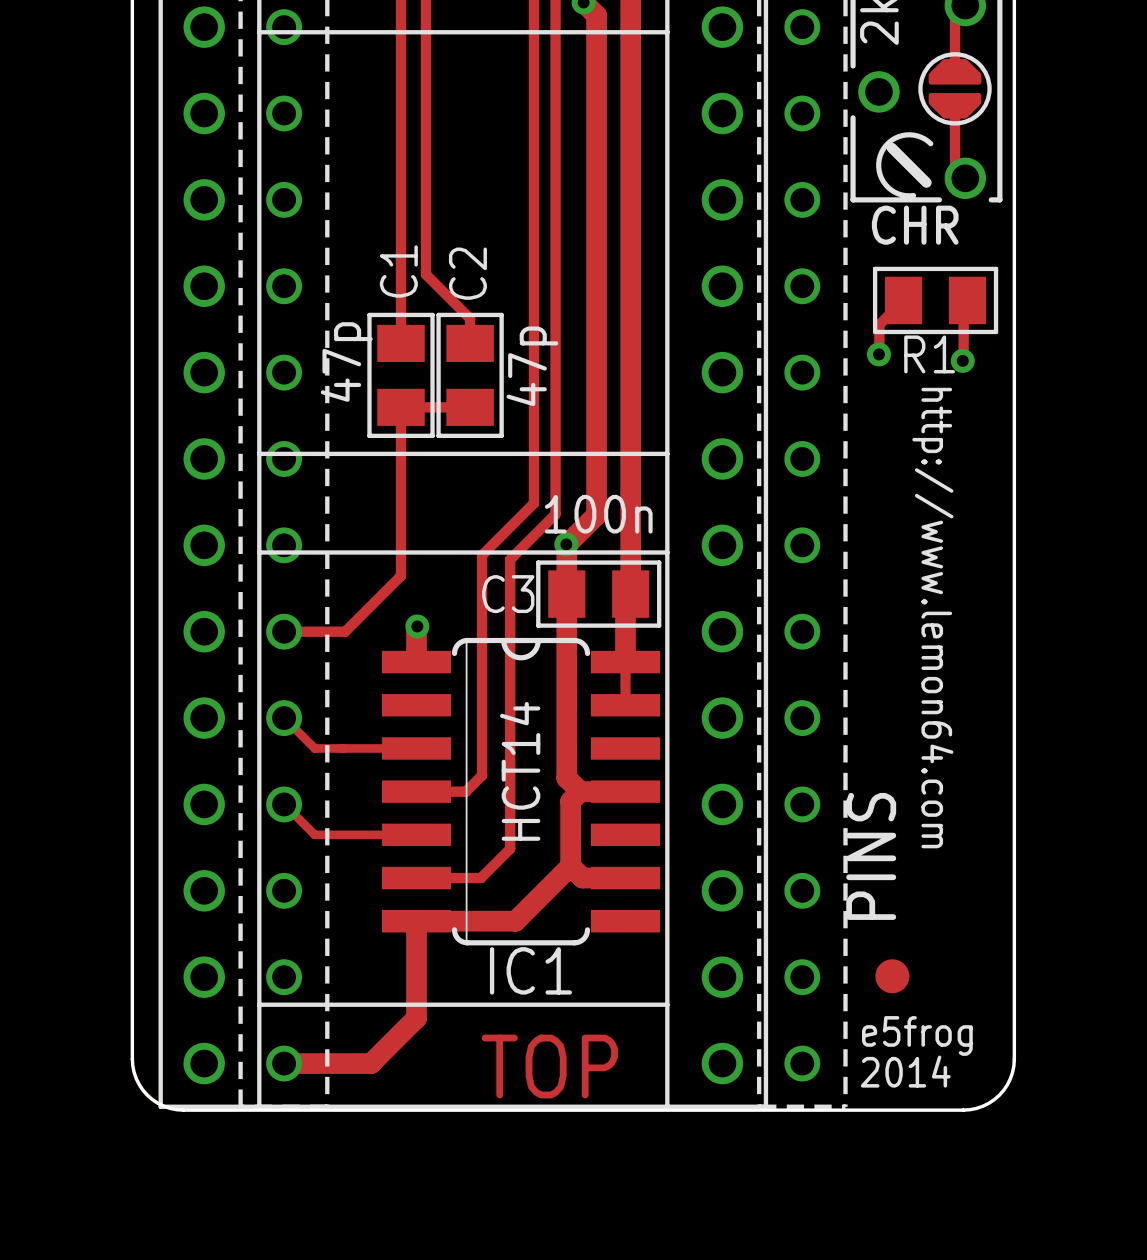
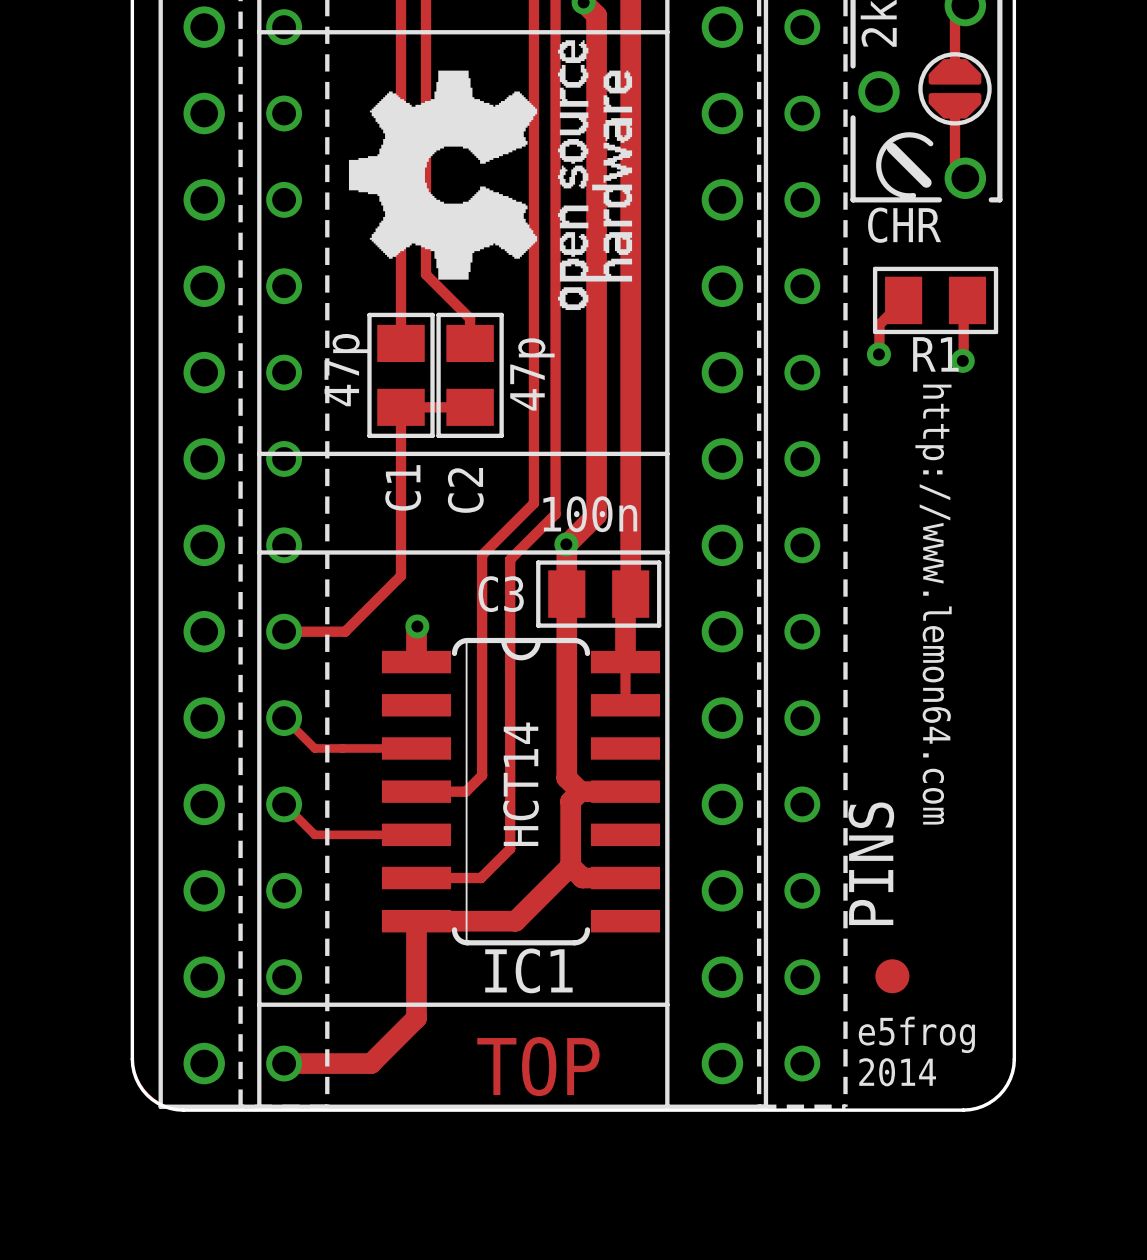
drawing: none -> [348, 40, 633, 311]
C1 name position: C1 (398, 271) -> C1 (403, 487)
C2 name position: C2 (467, 273) -> C2 (465, 490)

